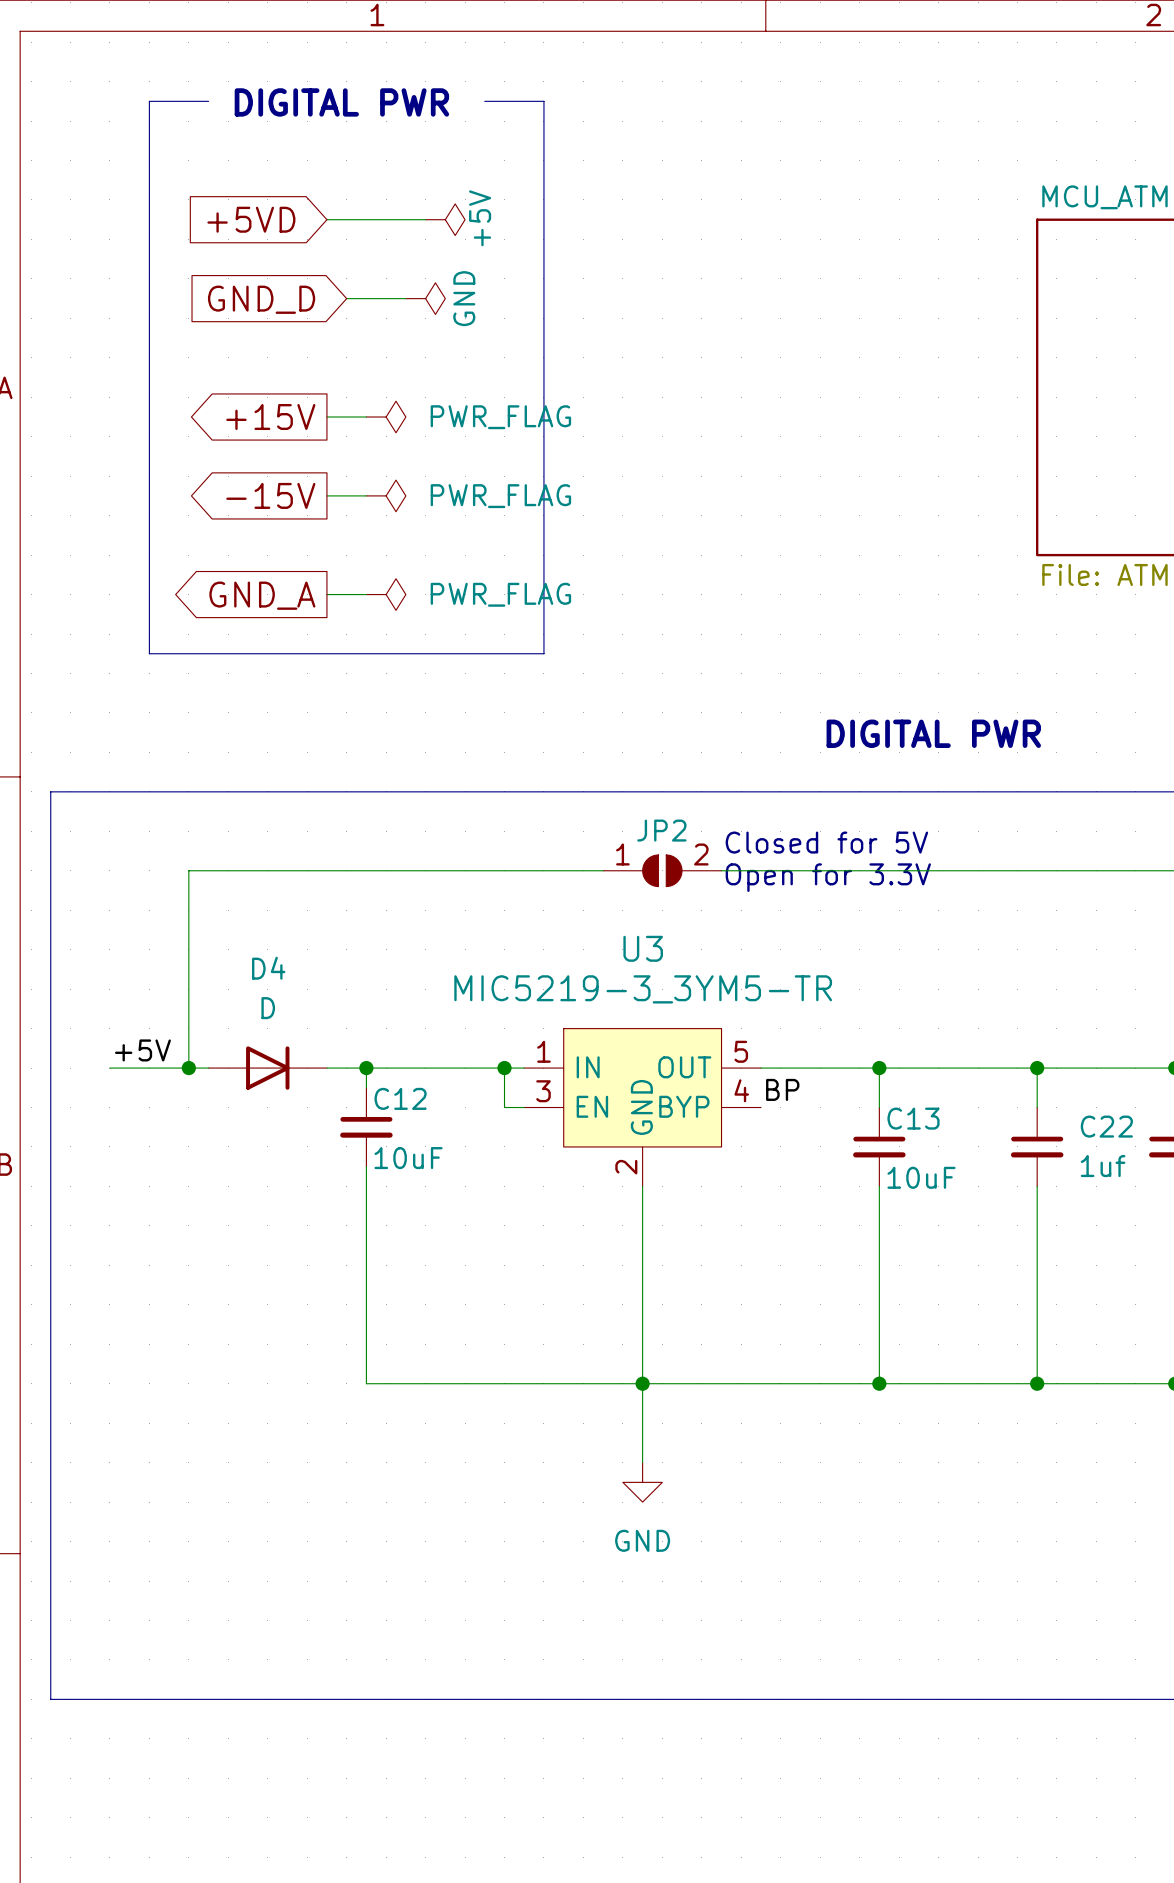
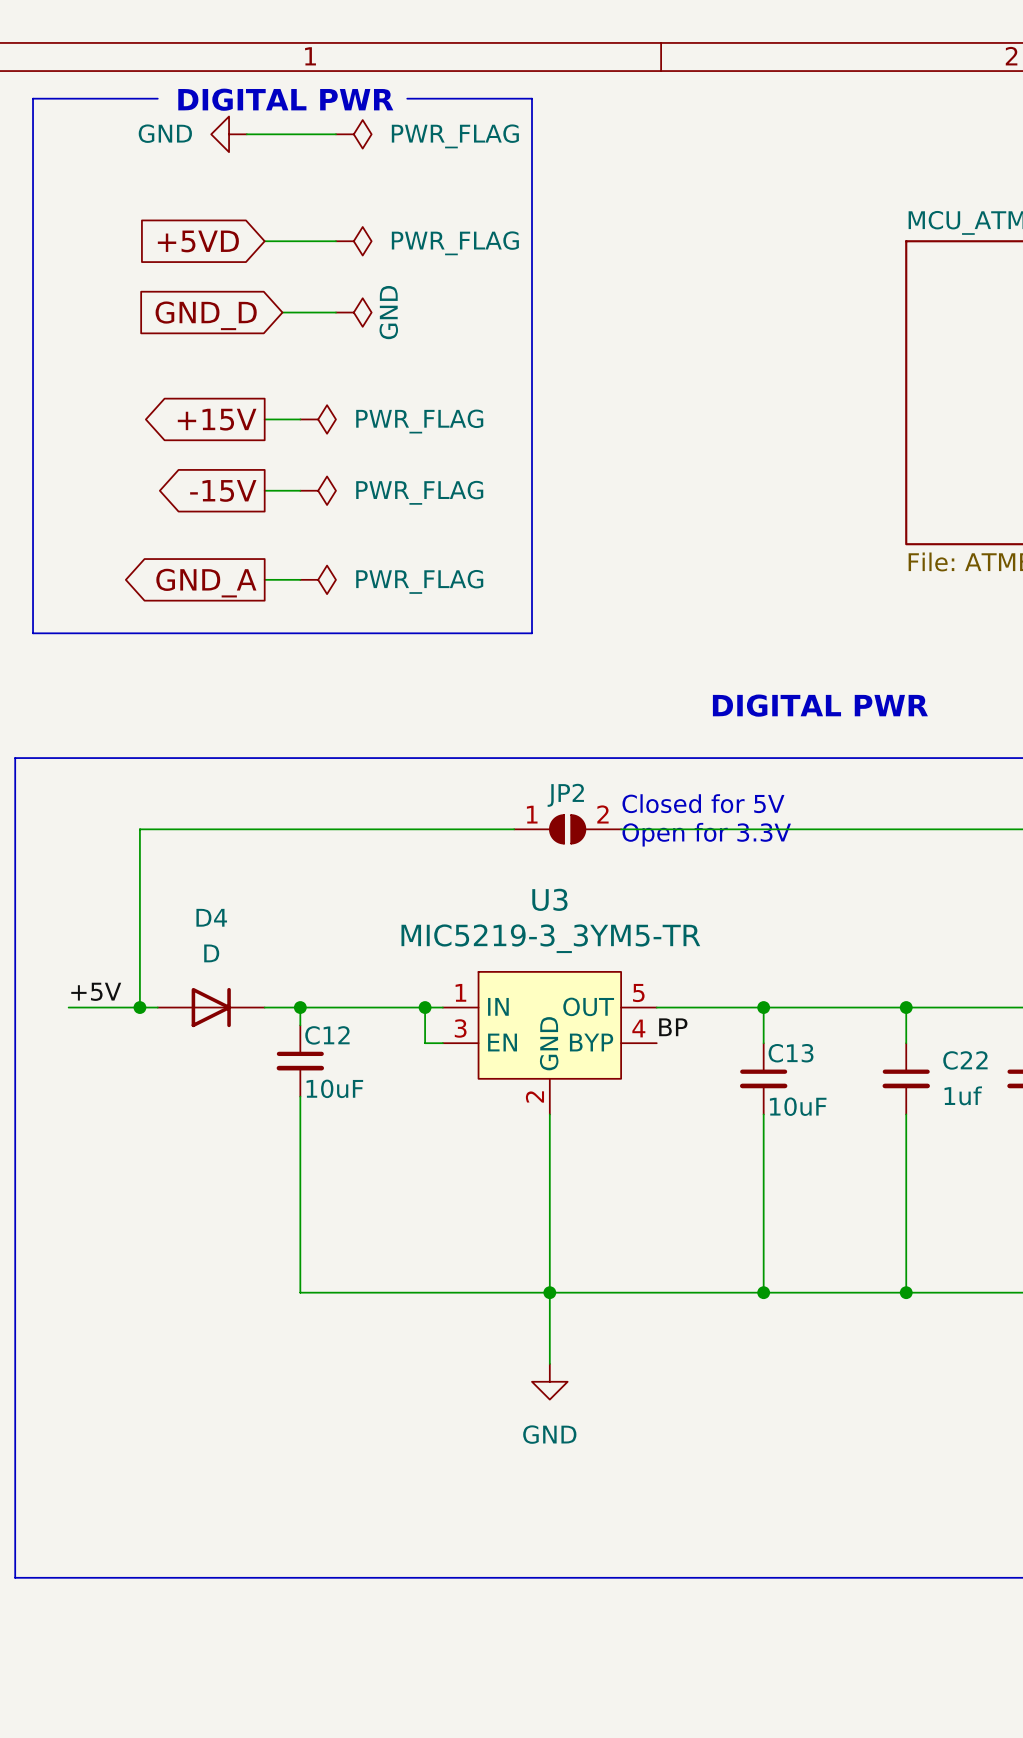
line: (208, 101) (149, 101) (149, 653) -> (157, 98) (33, 98) (33, 633) (104, 633)
power symbol: none -> GND (229, 134)
wire: none -> (246, 134) (335, 134)
power symbol: none -> PWR_FLAG (353, 134)
line: (484, 101) (543, 101) (543, 653) -> (407, 98) (532, 98) (532, 633) (460, 633)
text position: DIGITAL PWR (341, 102) -> DIGITAL PWR (285, 99)
power symbol: none -> PWR_FLAG (353, 241)
power symbol: +5V (445, 219) -> none

